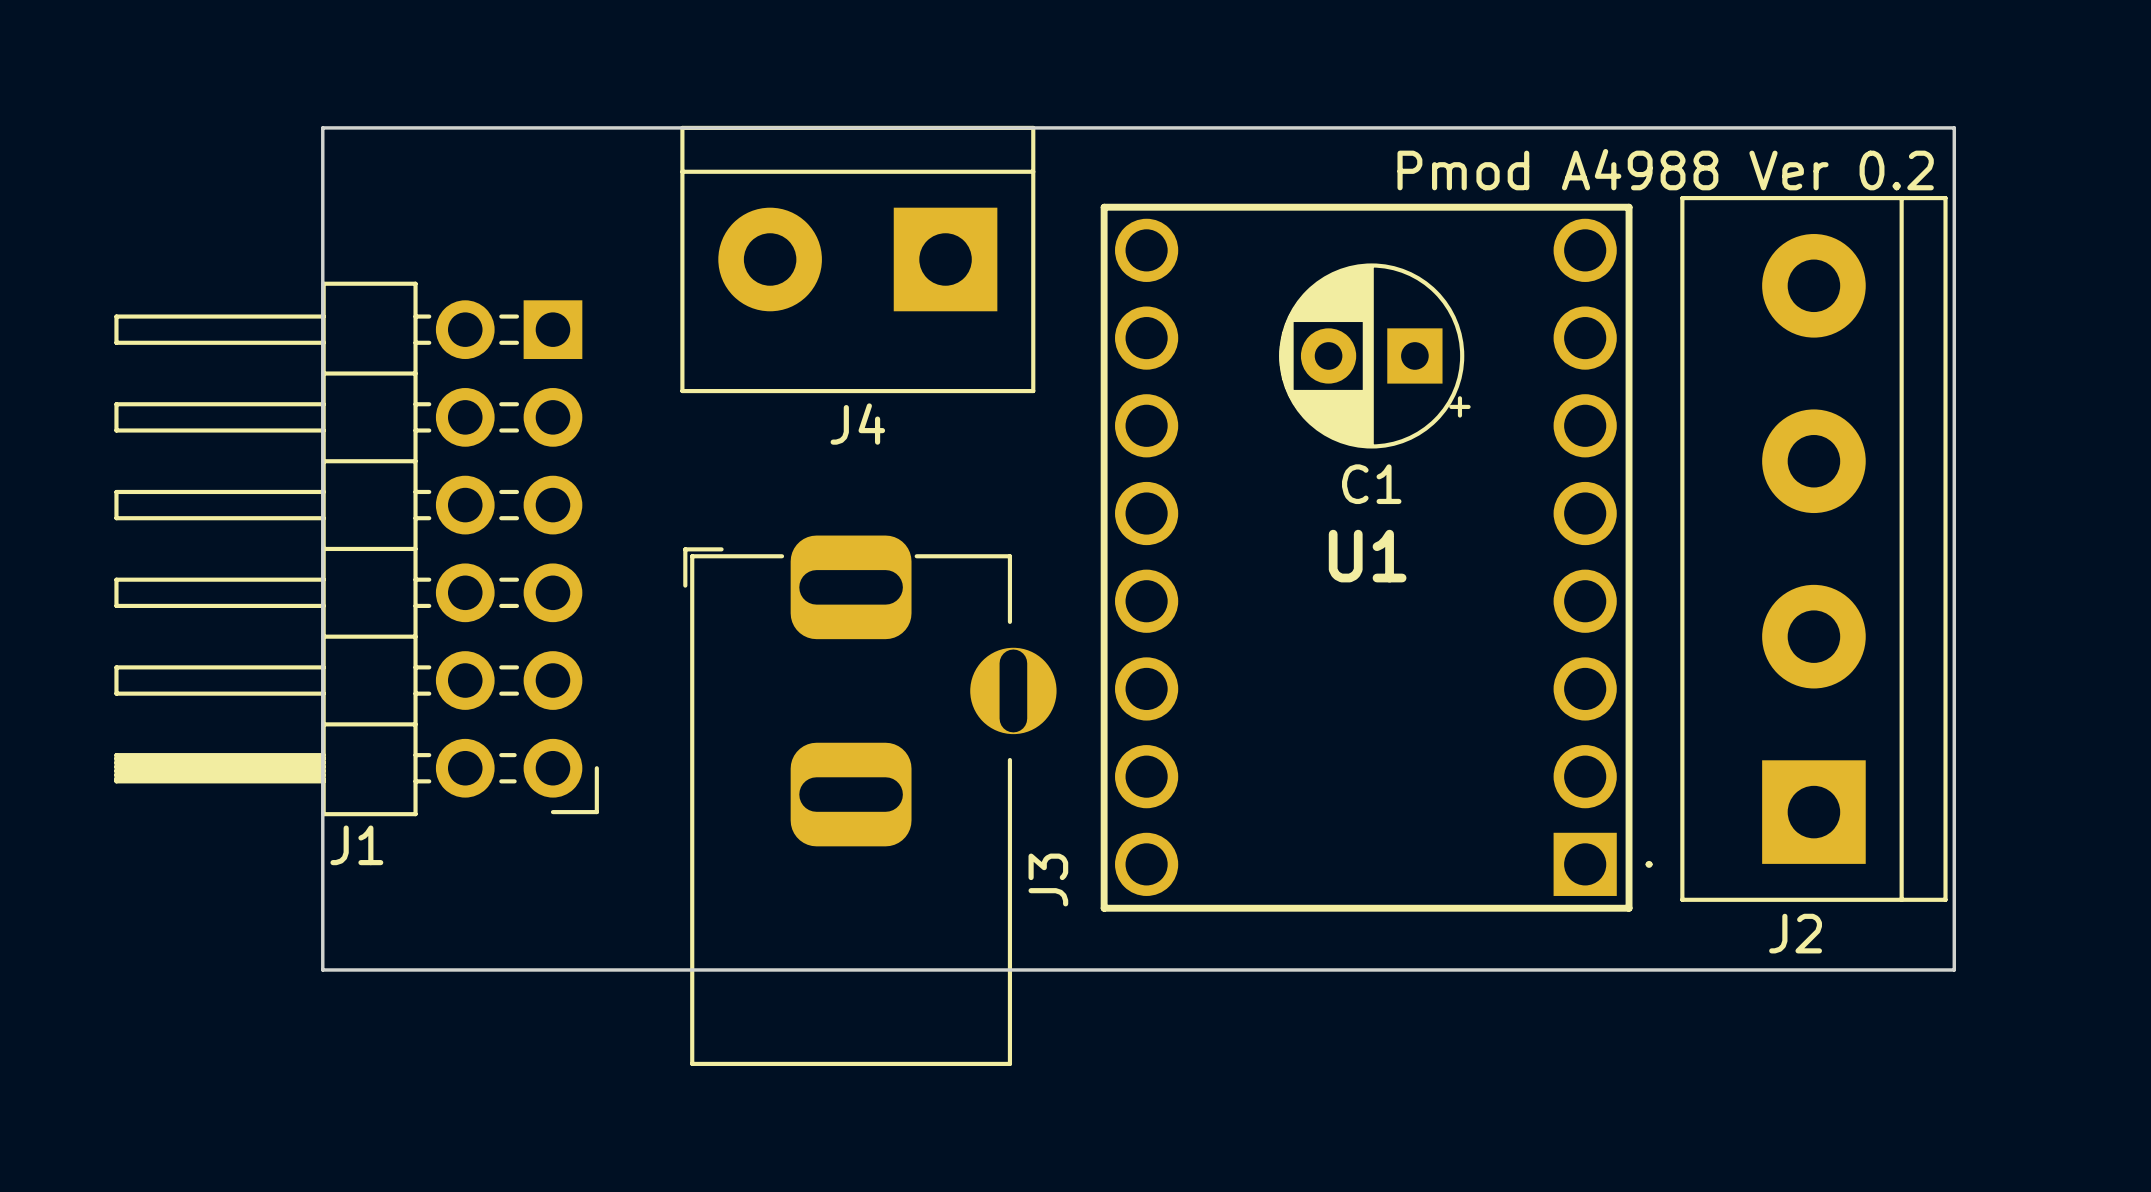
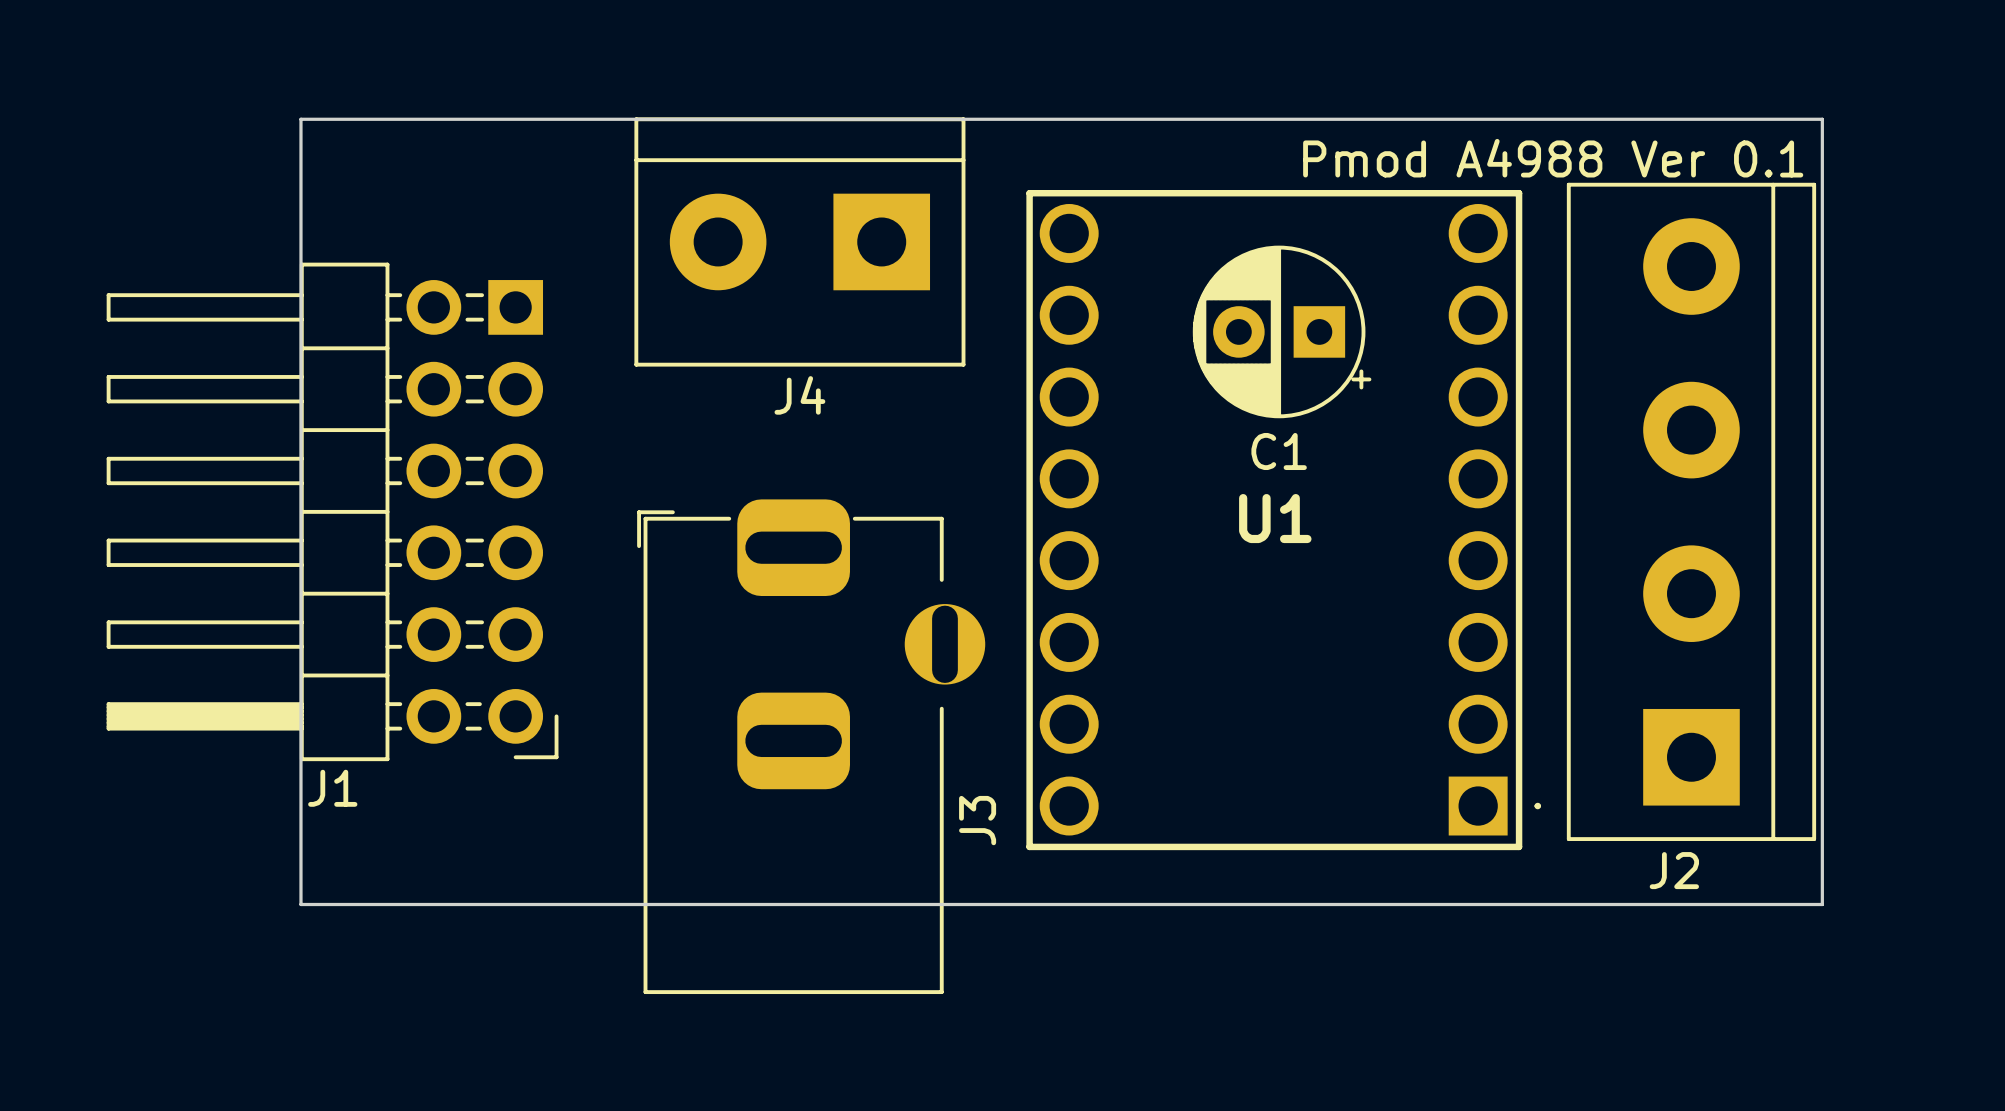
text: Pmod A4988 Ver 0.2 (1665, 169) -> Pmod A4988 Ver 0.1 (1553, 158)

